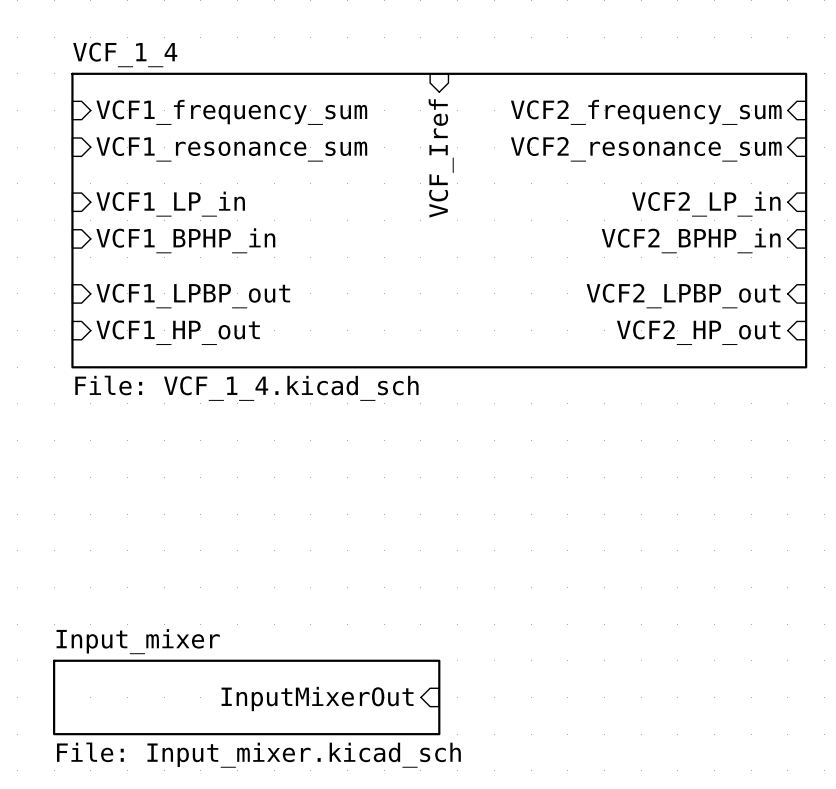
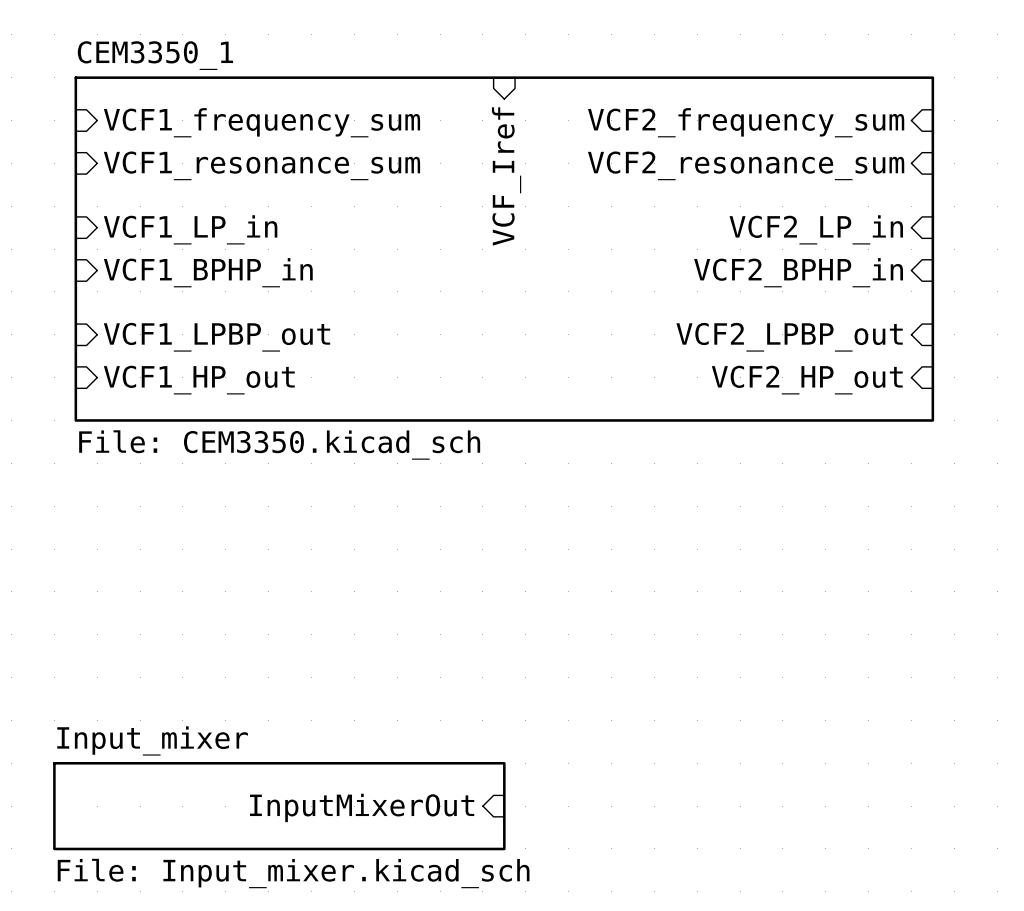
sheet VCF_1_4 name: VCF_1_4 (125, 54) -> CEM3350_1 (155, 55)
sheet VCF_1_4 value: File: VCF_1_4.kicad_sch (246, 388) -> File: CEM3350.kicad_sch (279, 445)

